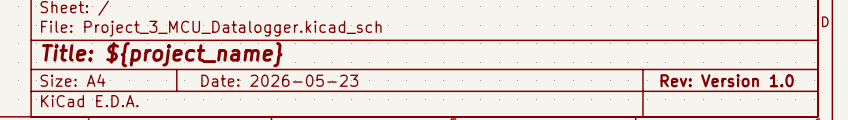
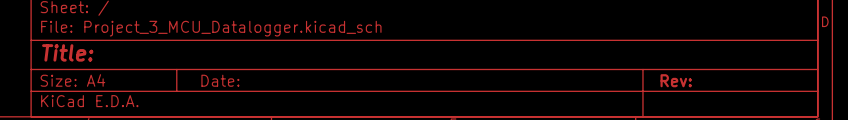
title block: Title: ${project_name} (162, 54) -> Title: (67, 52)
title block: Date: 2026-05-23 (279, 80) -> Date: (220, 80)
title block: Rev: Version 1.0 (727, 80) -> Rev: (676, 80)

